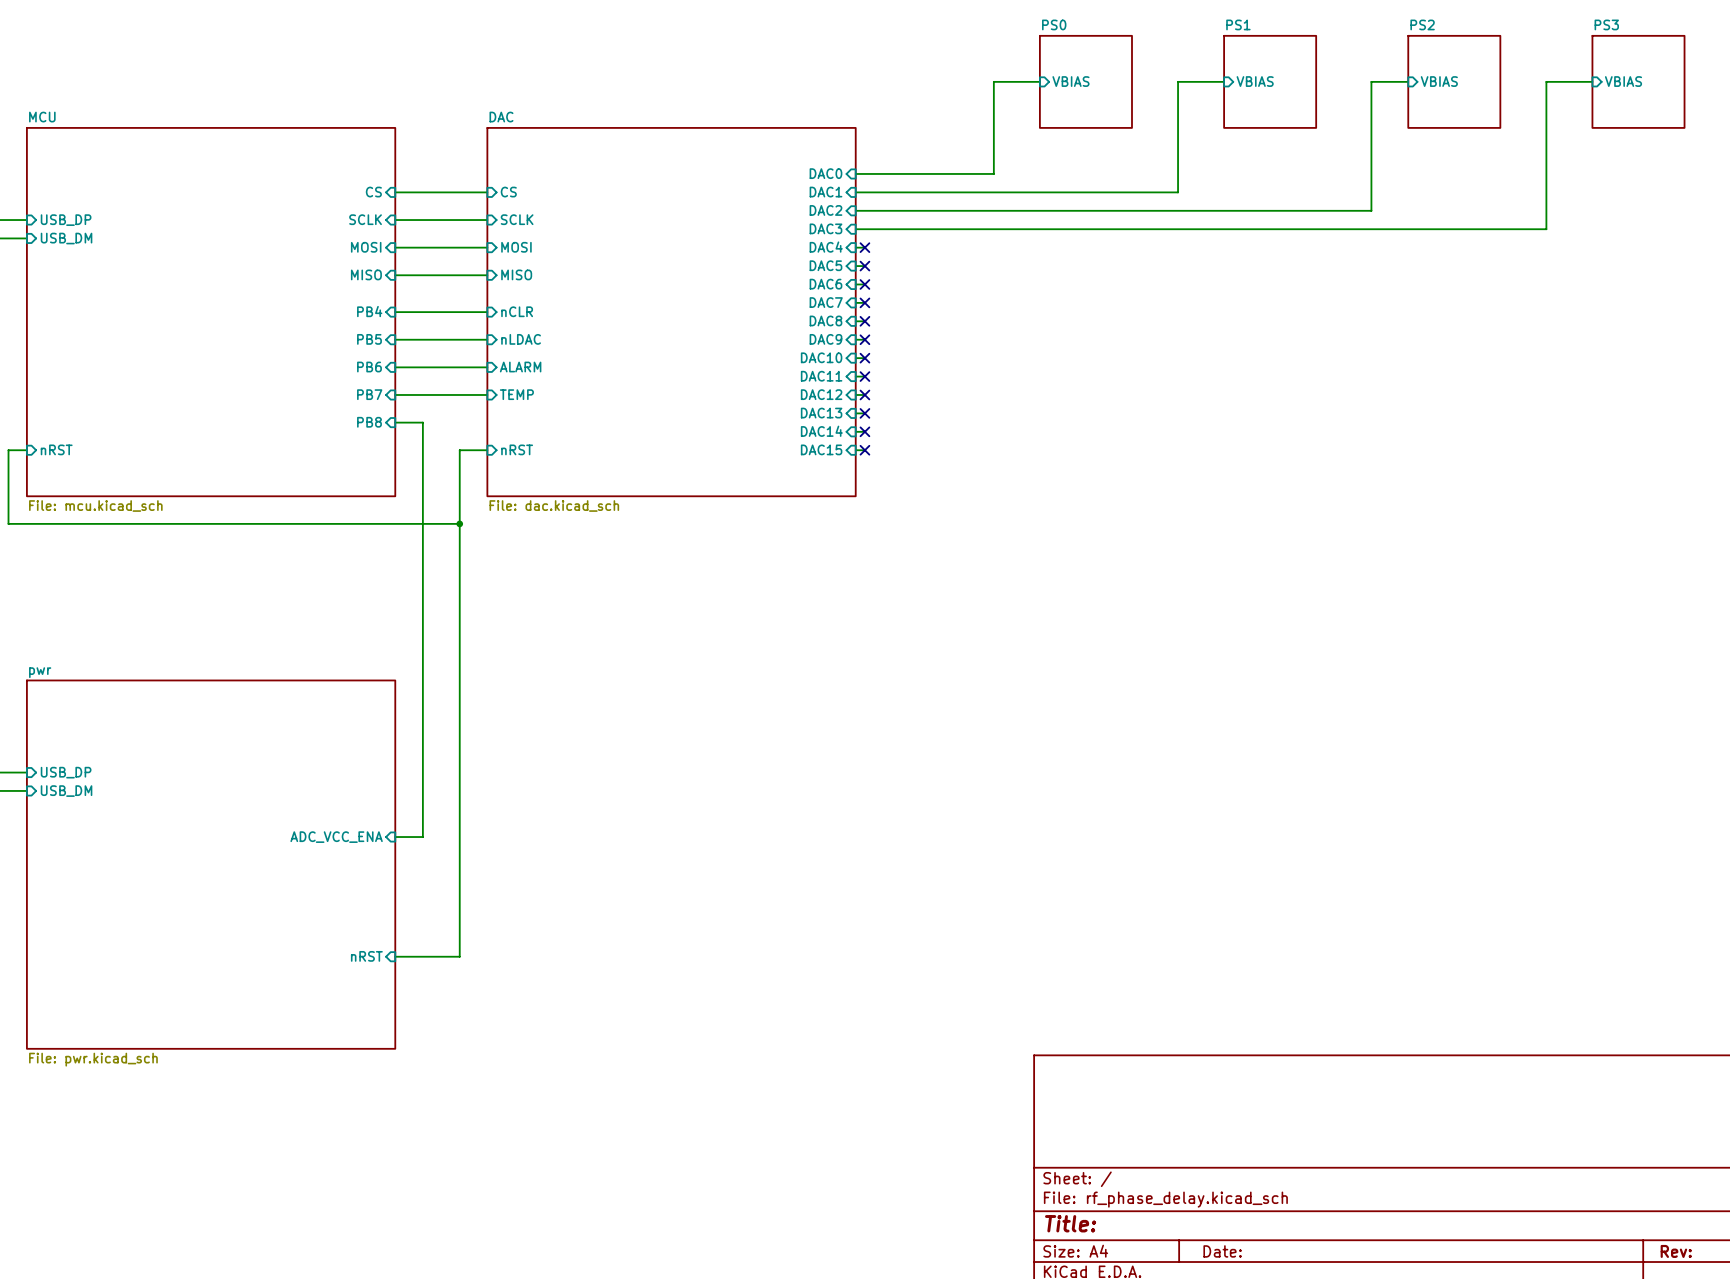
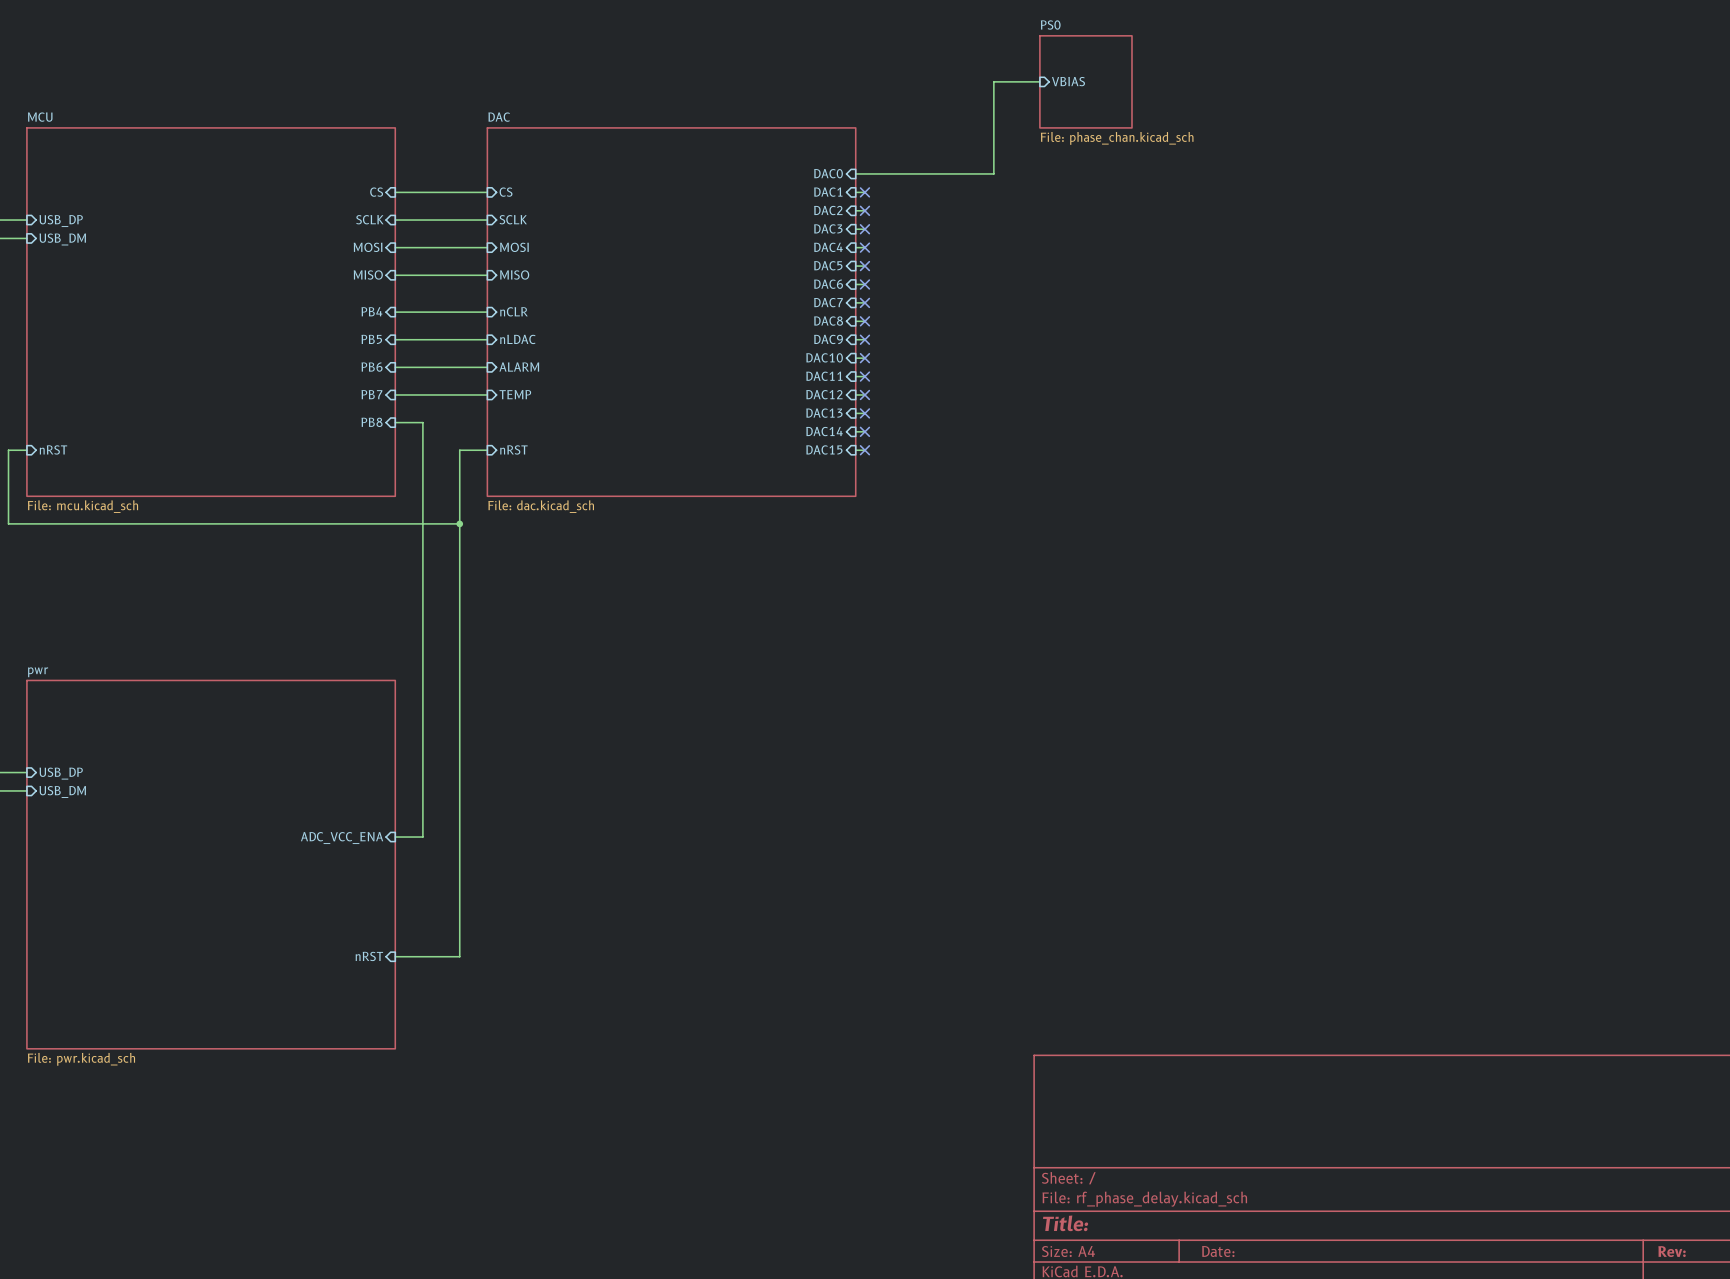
wire: (1224, 81) (1178, 81) (1178, 192) (864, 192) -> none
sheet pin: VBIAS (1255, 81) -> none
sheet PS1: (1270, 81) -> none
wire: (1408, 81) (1371, 81) (1371, 210) (864, 210) -> none
sheet pin: VBIAS (1439, 81) -> none
sheet PS2: (1454, 81) -> none
wire: (1592, 81) (1546, 81) (1546, 229) (864, 229) -> none
sheet pin: VBIAS (1623, 81) -> none
sheet PS3: (1638, 81) -> none
sheet PS0 value: none -> File: phase_chan.kicad_sch (1117, 138)
no-connect mark: none -> (864, 192)
no-connect mark: none -> (864, 210)
no-connect mark: none -> (864, 229)

